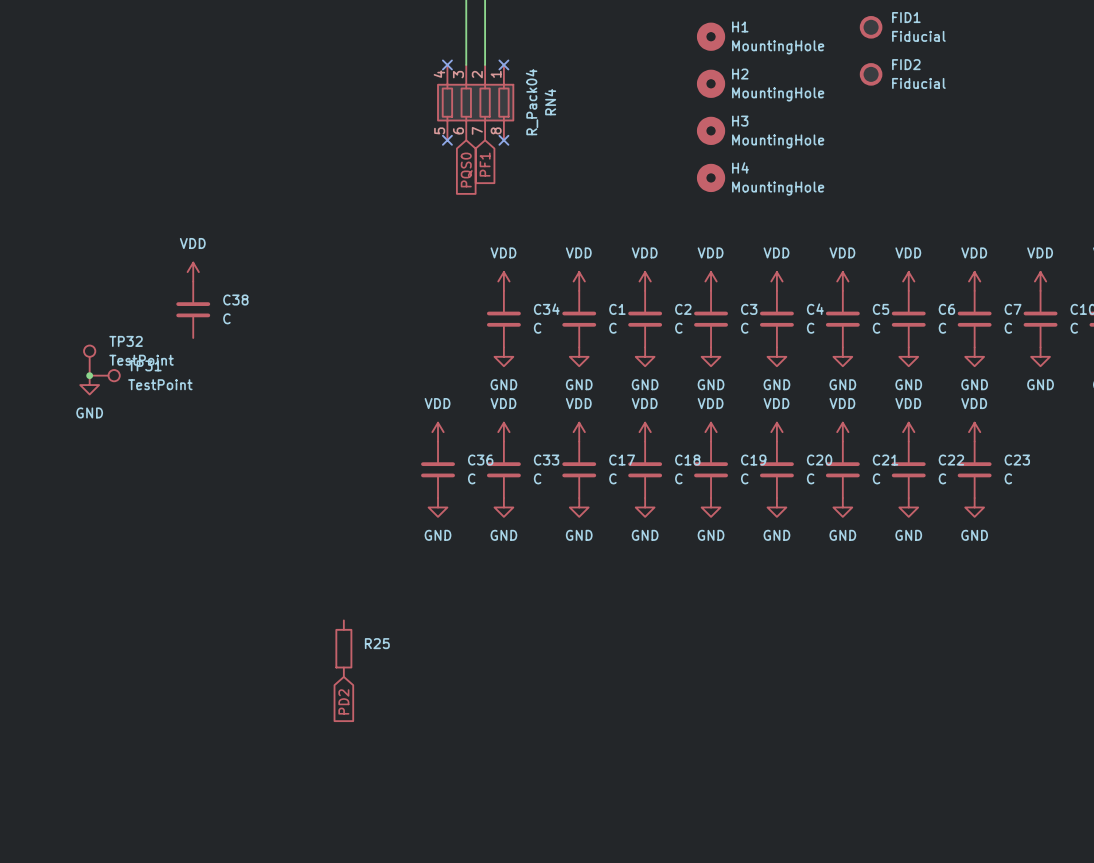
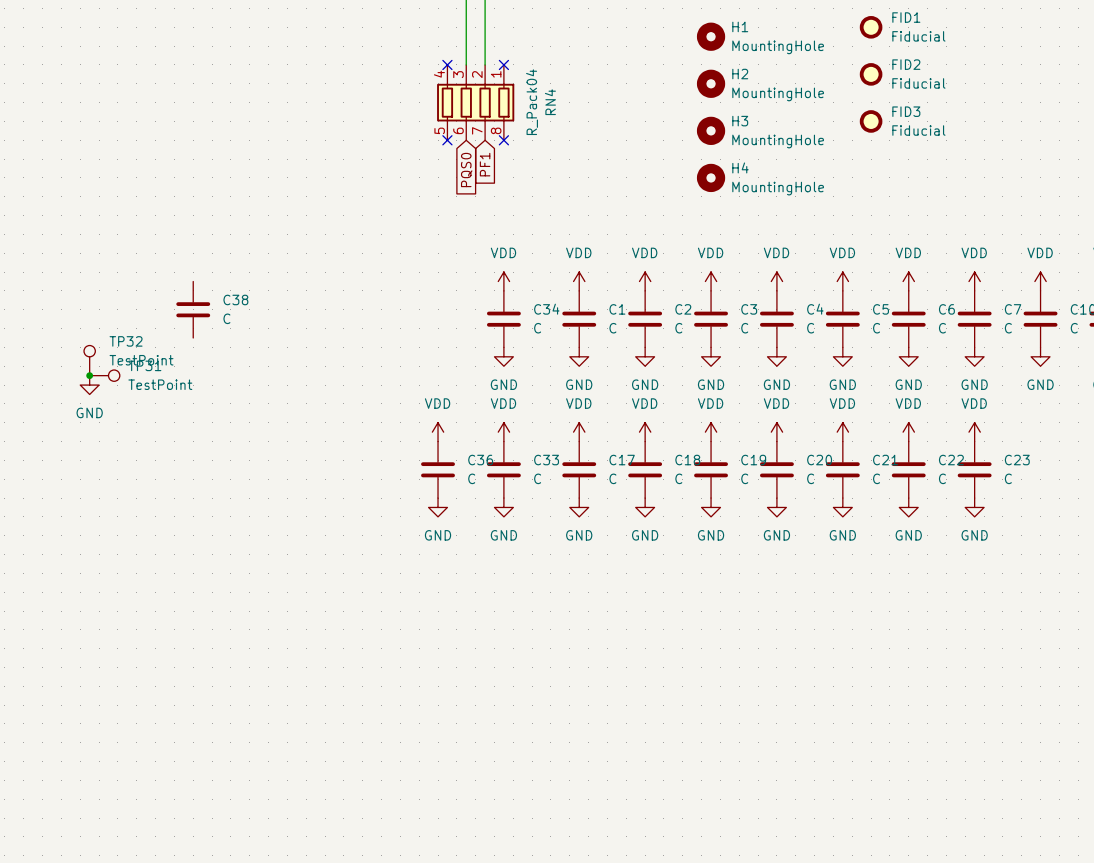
FID3: none -> Fiducial (871, 121)
power symbol: VDD (193, 272) -> none
R25: (343, 648) -> none
global label: PD2 (343, 701) -> none

